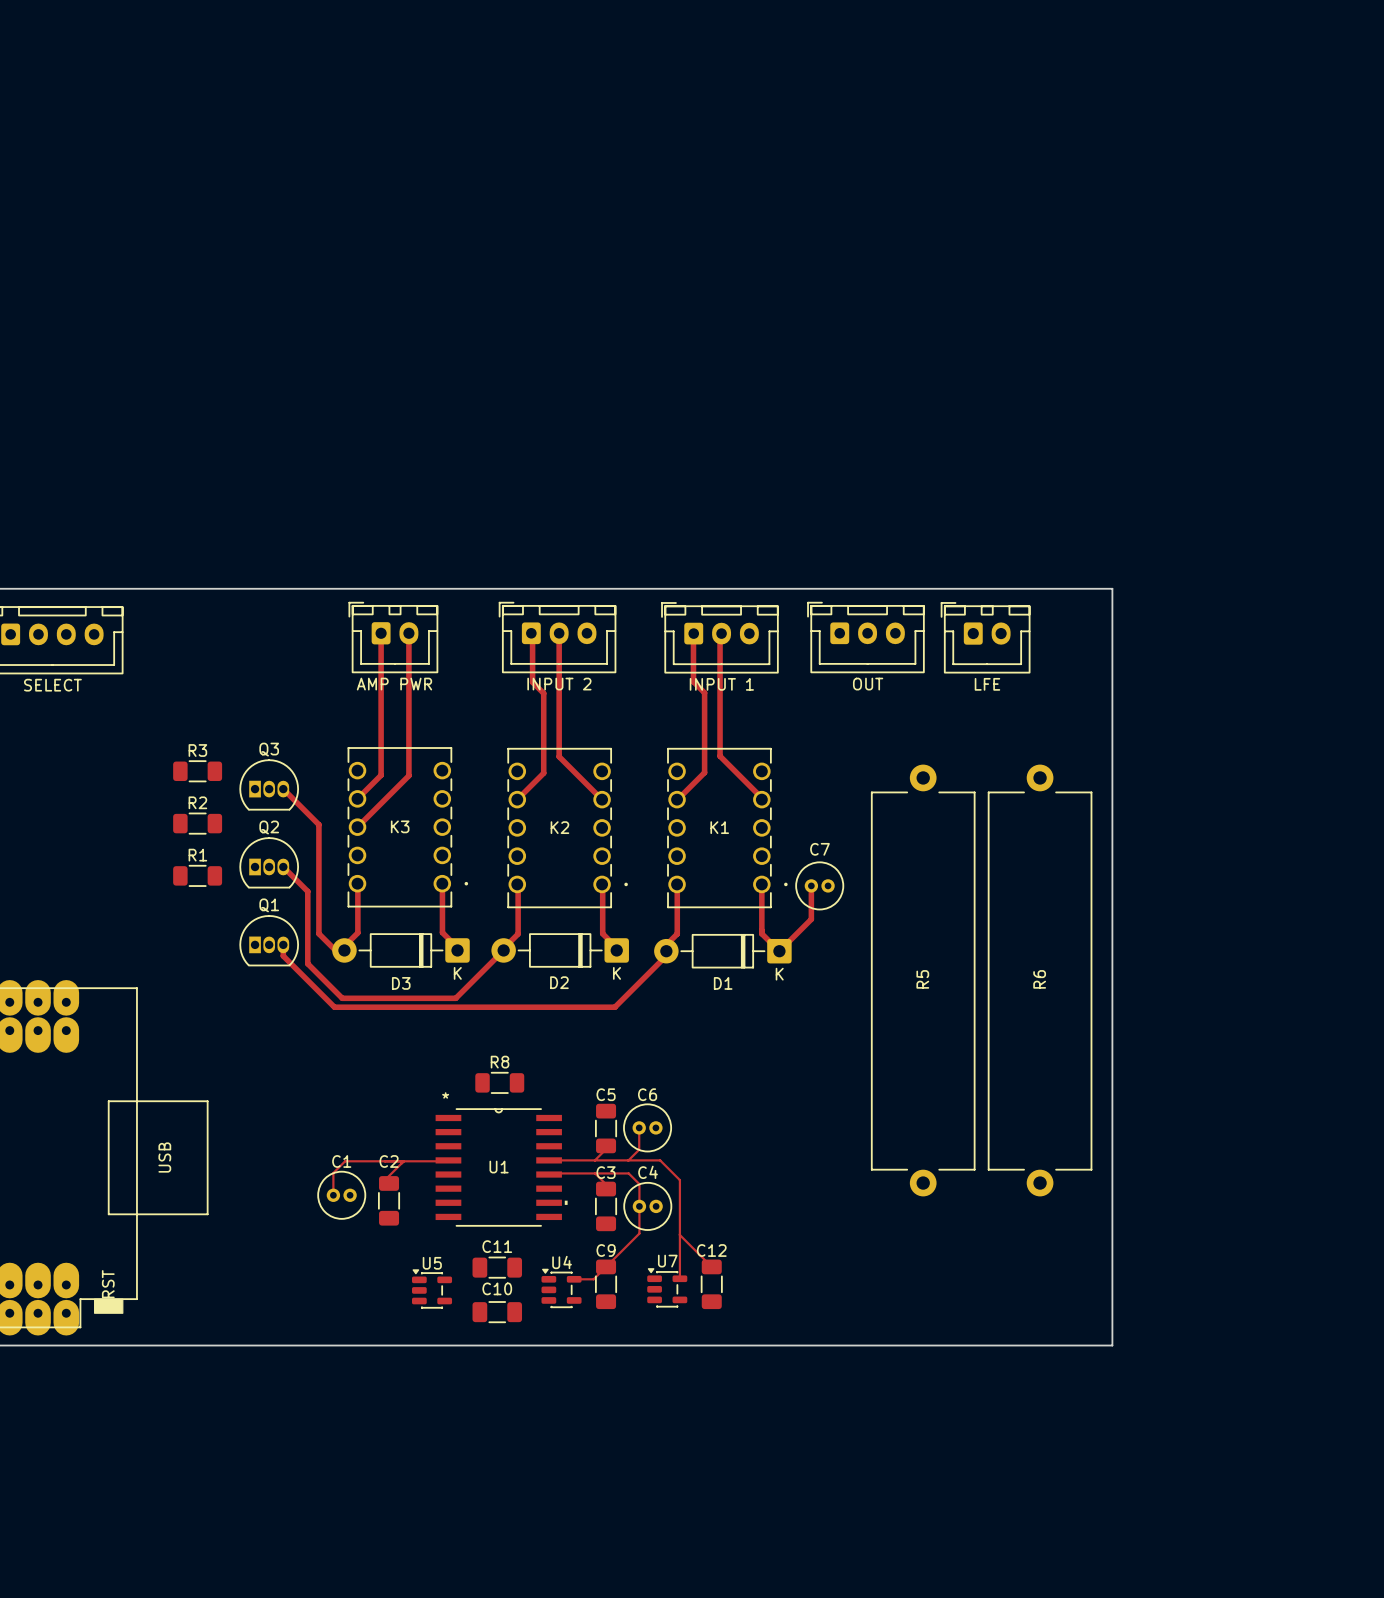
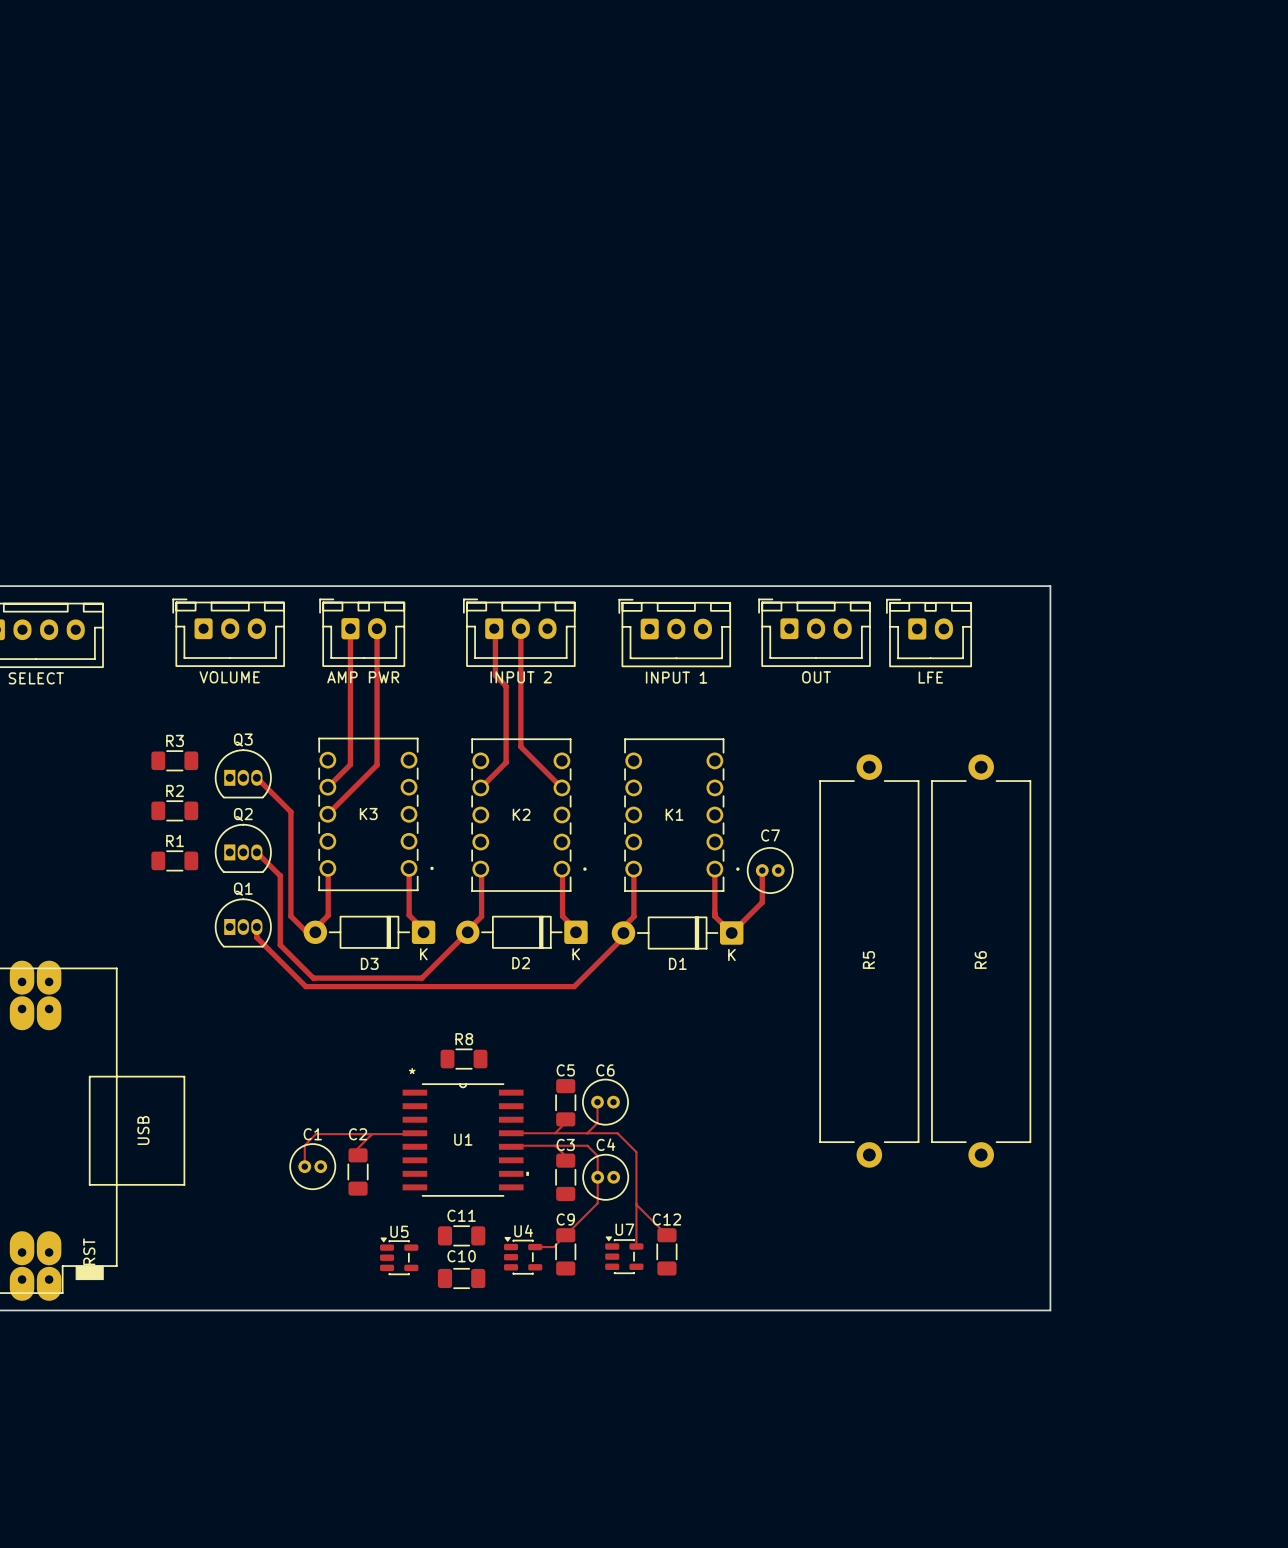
top track: (720, 632) (720, 756) (762, 799) -> none
top track: (693, 634) (693, 681) (704, 692) (704, 772) (678, 799) -> none
part: none -> VOLUME (228, 632)

